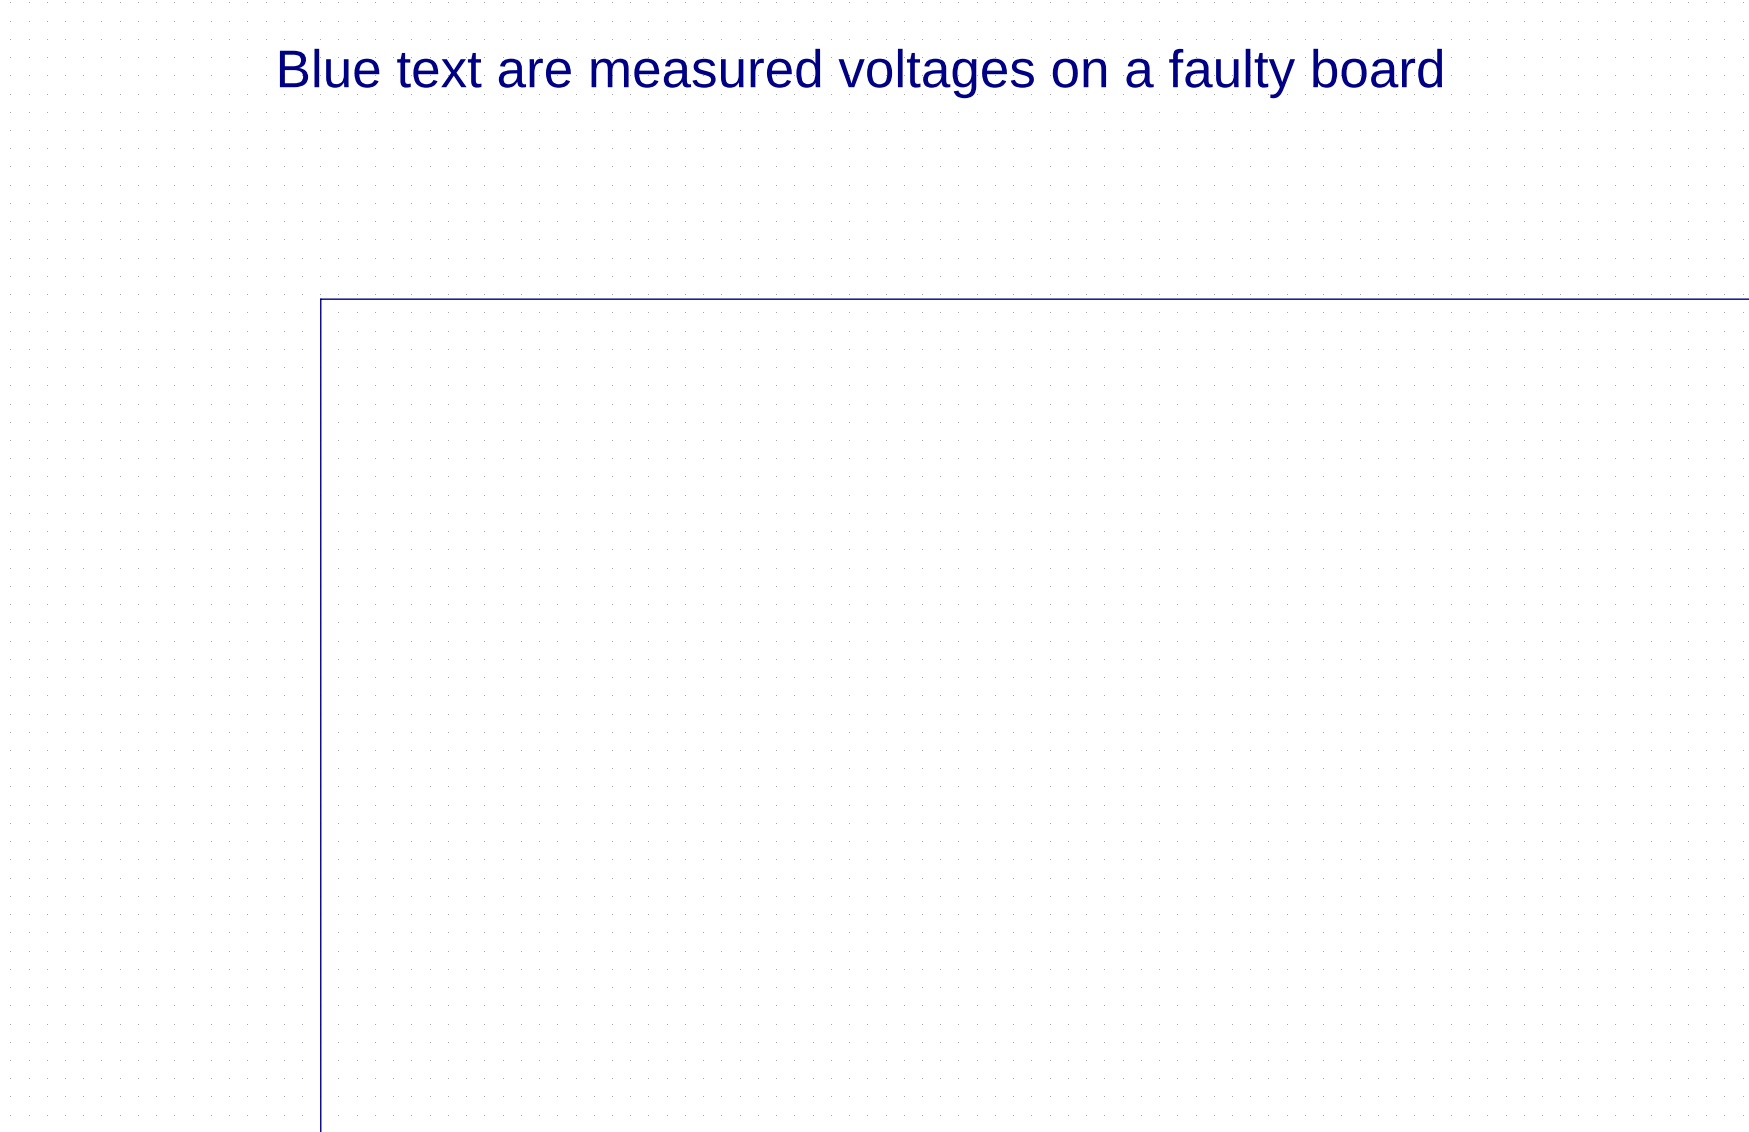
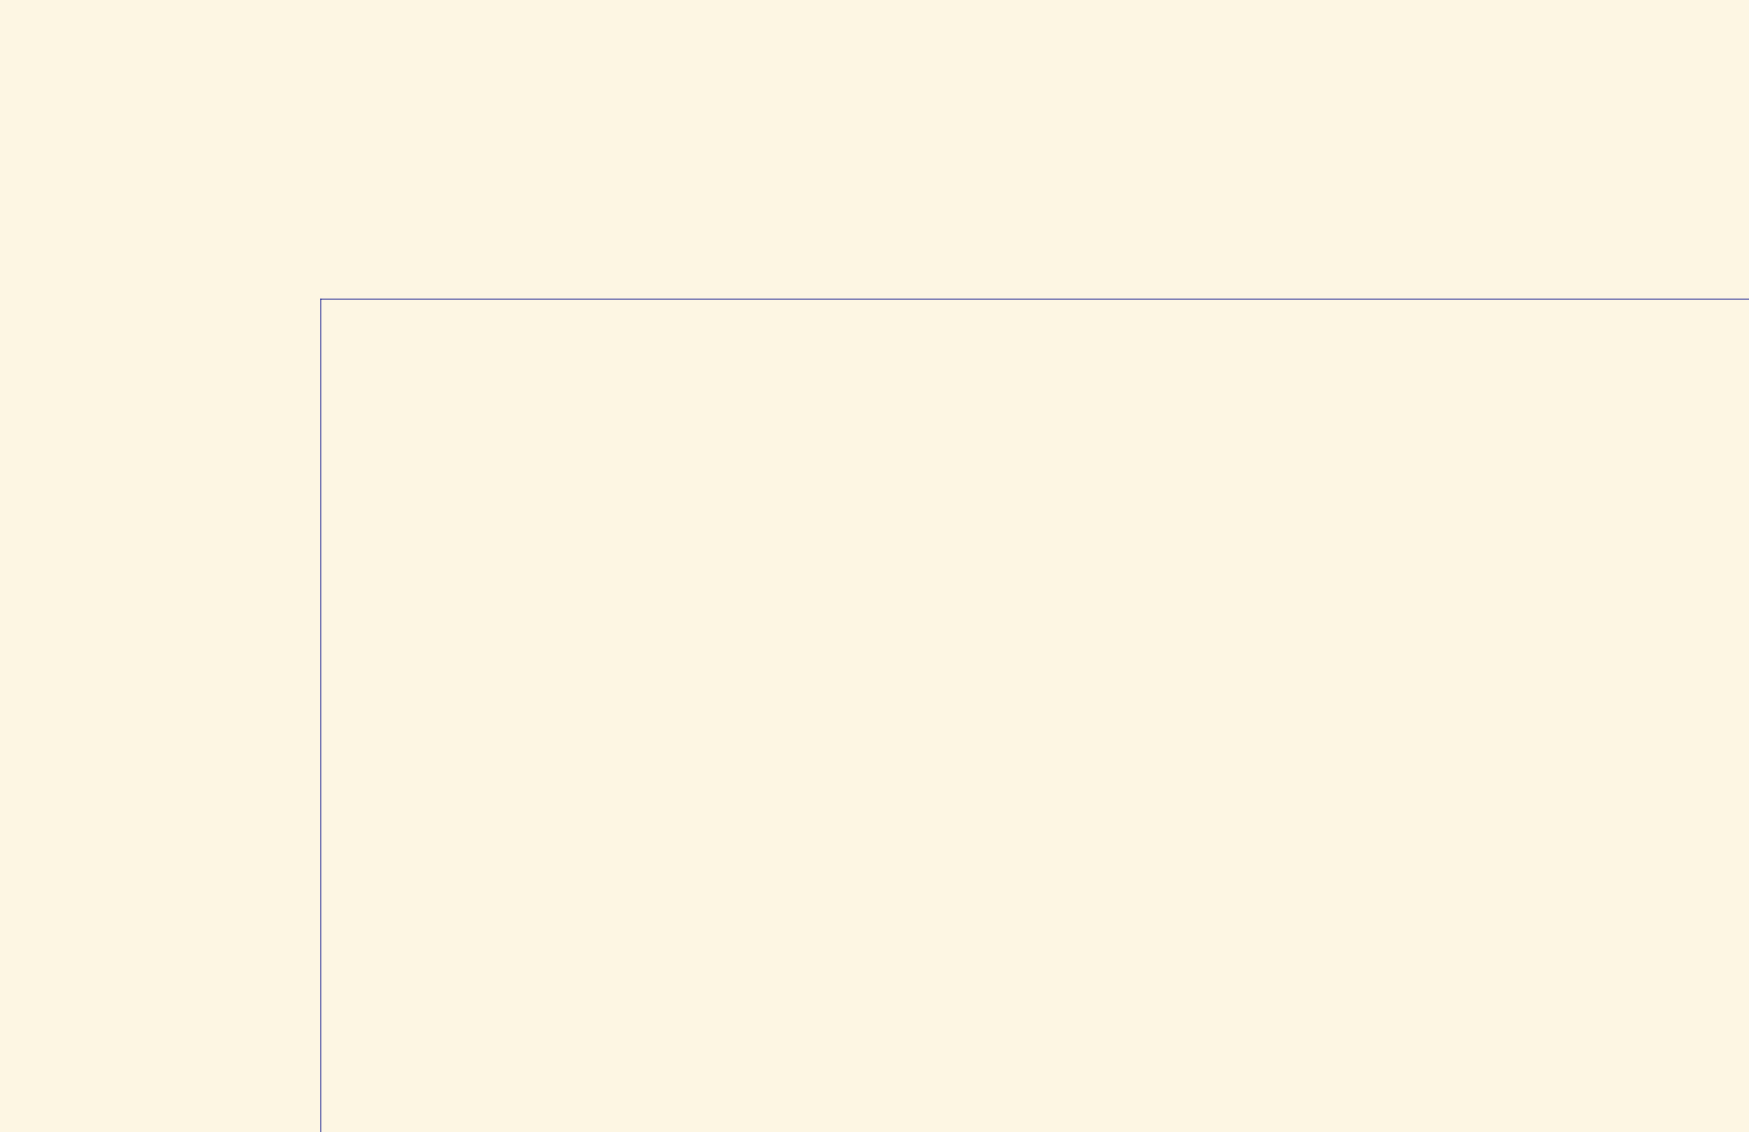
text: Blue text are measured voltages on a faulty board (860, 73) -> none

